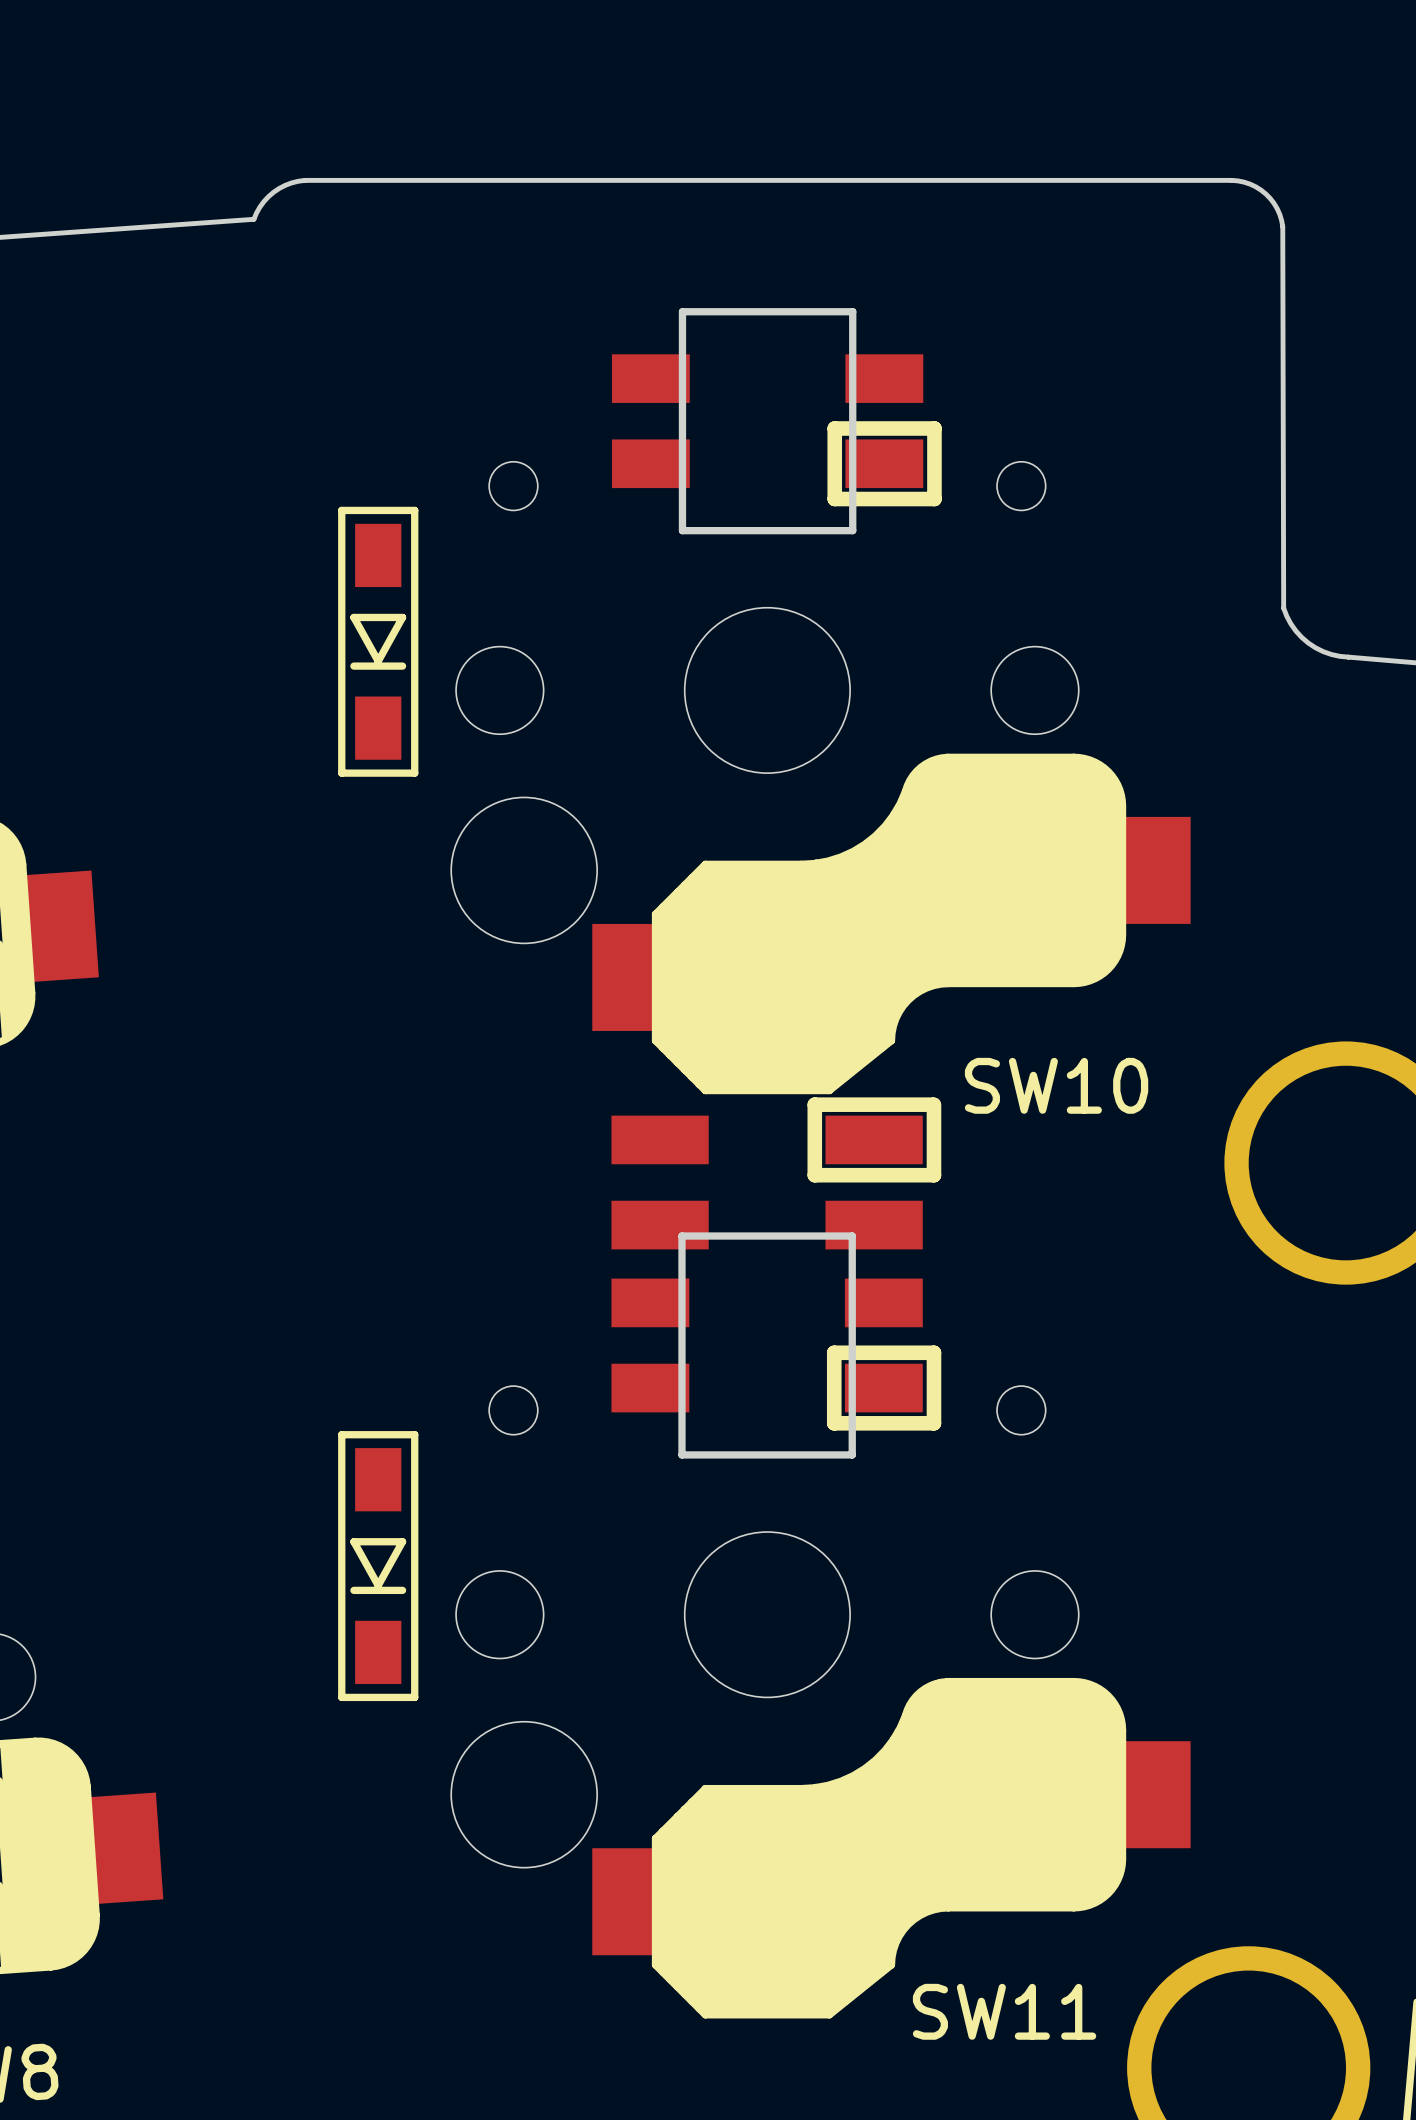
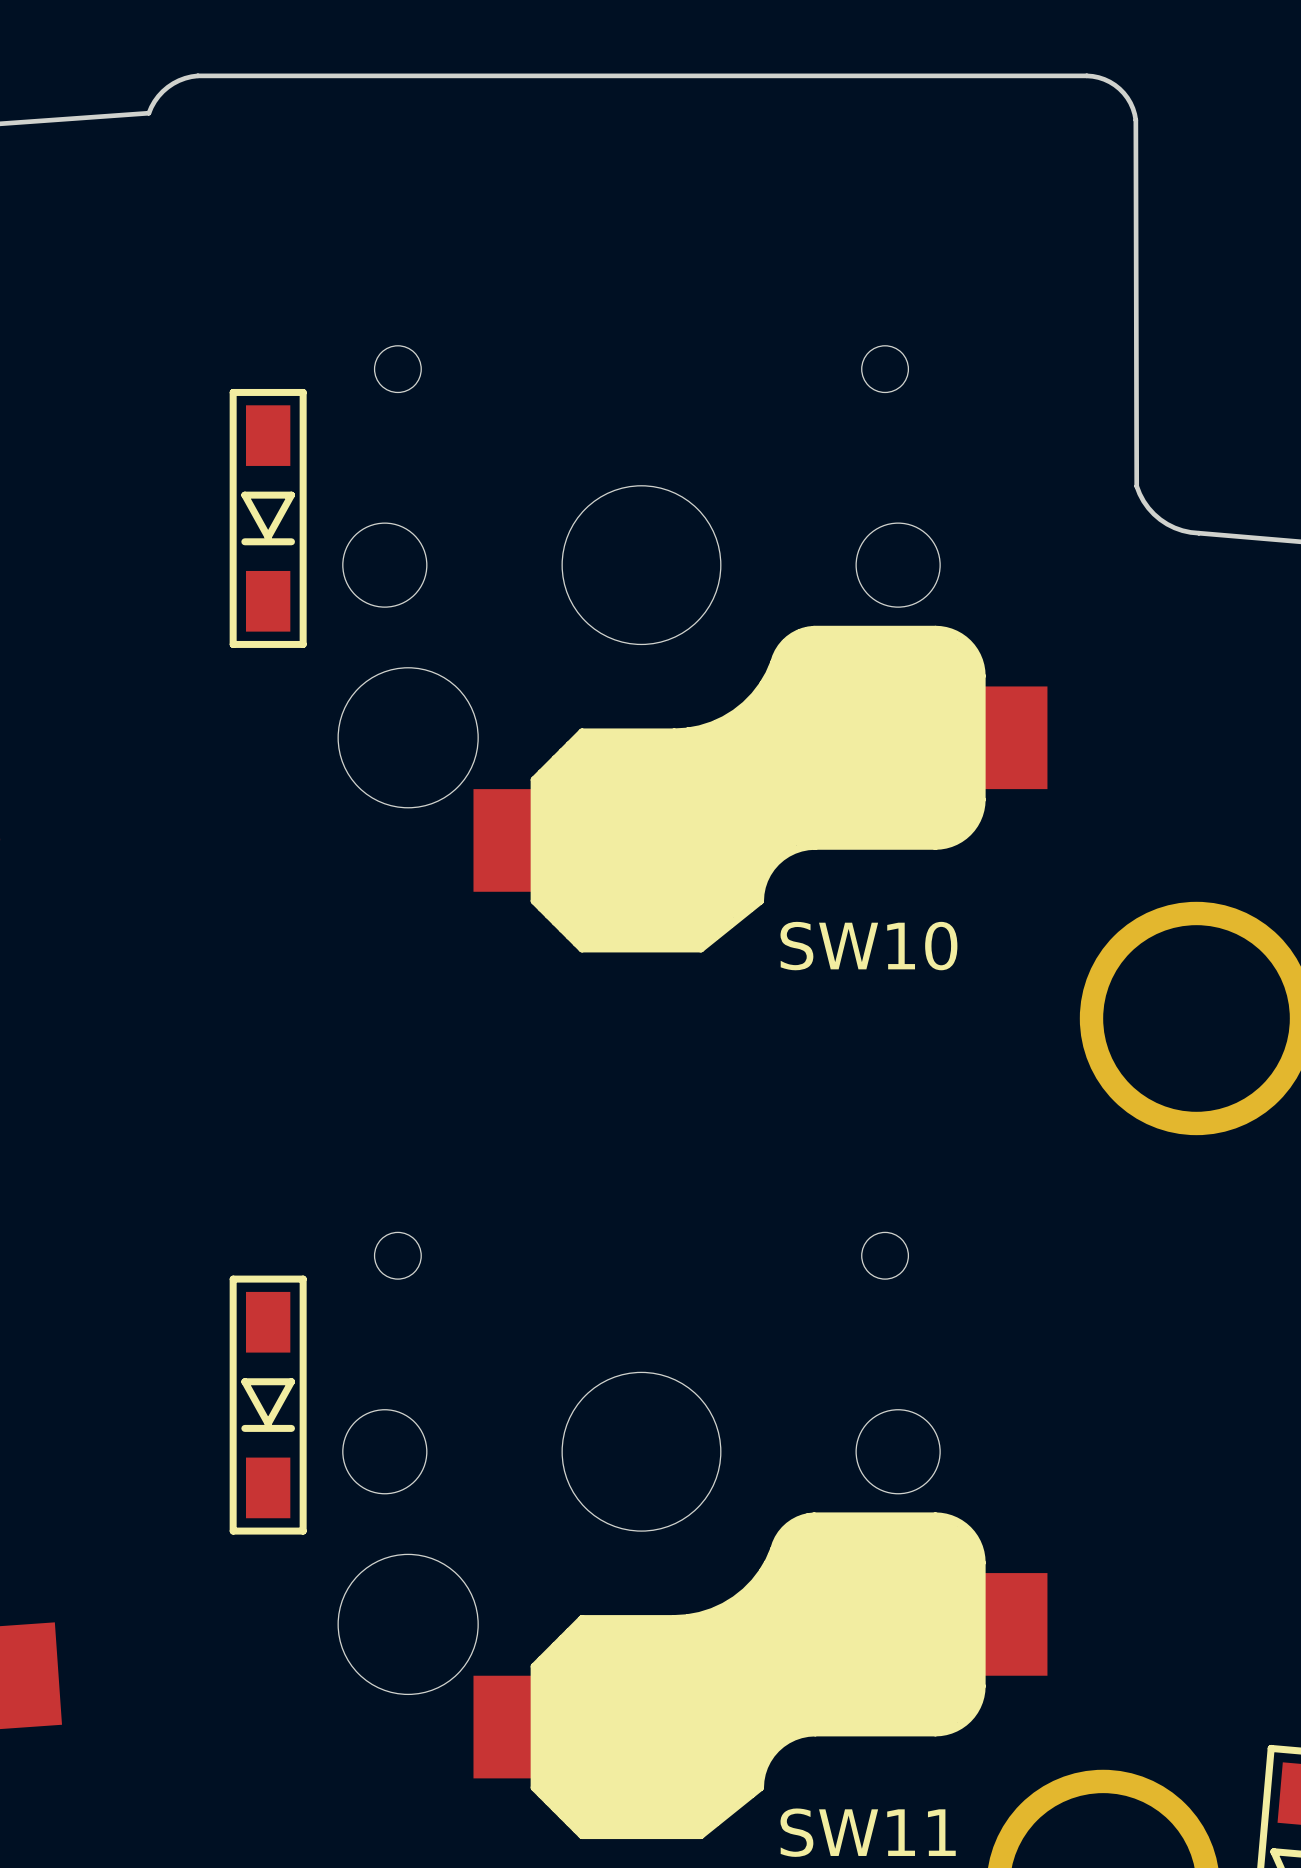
part: (776, 421) -> none
SW10 name position: SW10 (1056, 1085) -> SW10 (868, 946)
part: (776, 1173) -> none
part: (776, 1345) -> none

